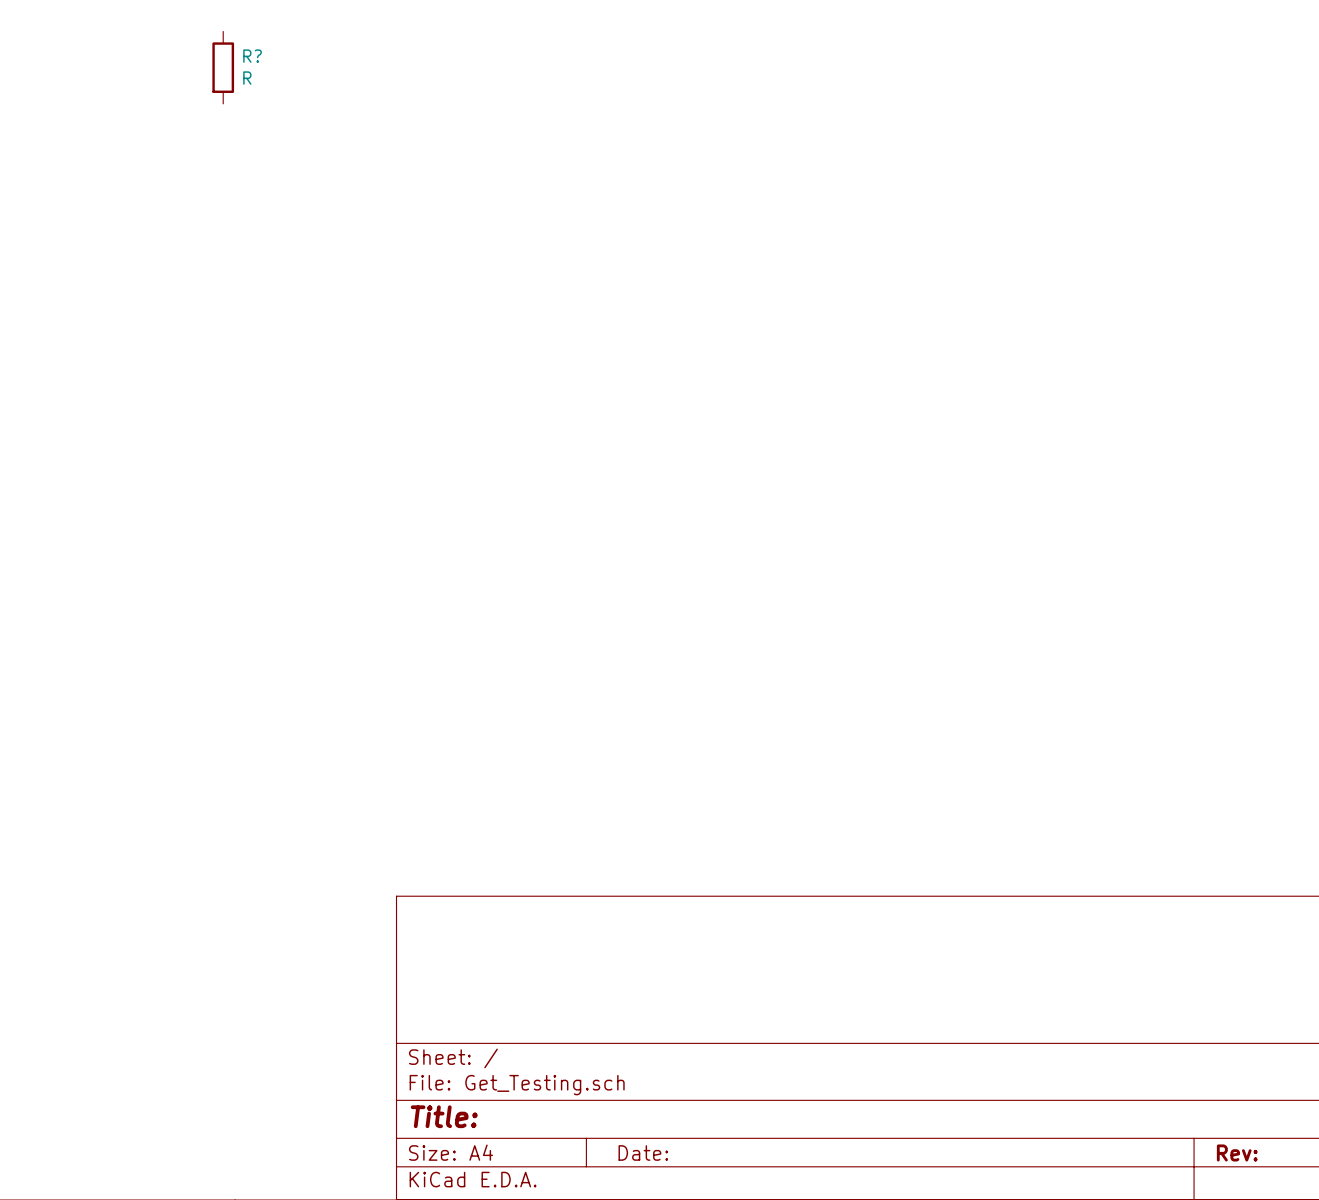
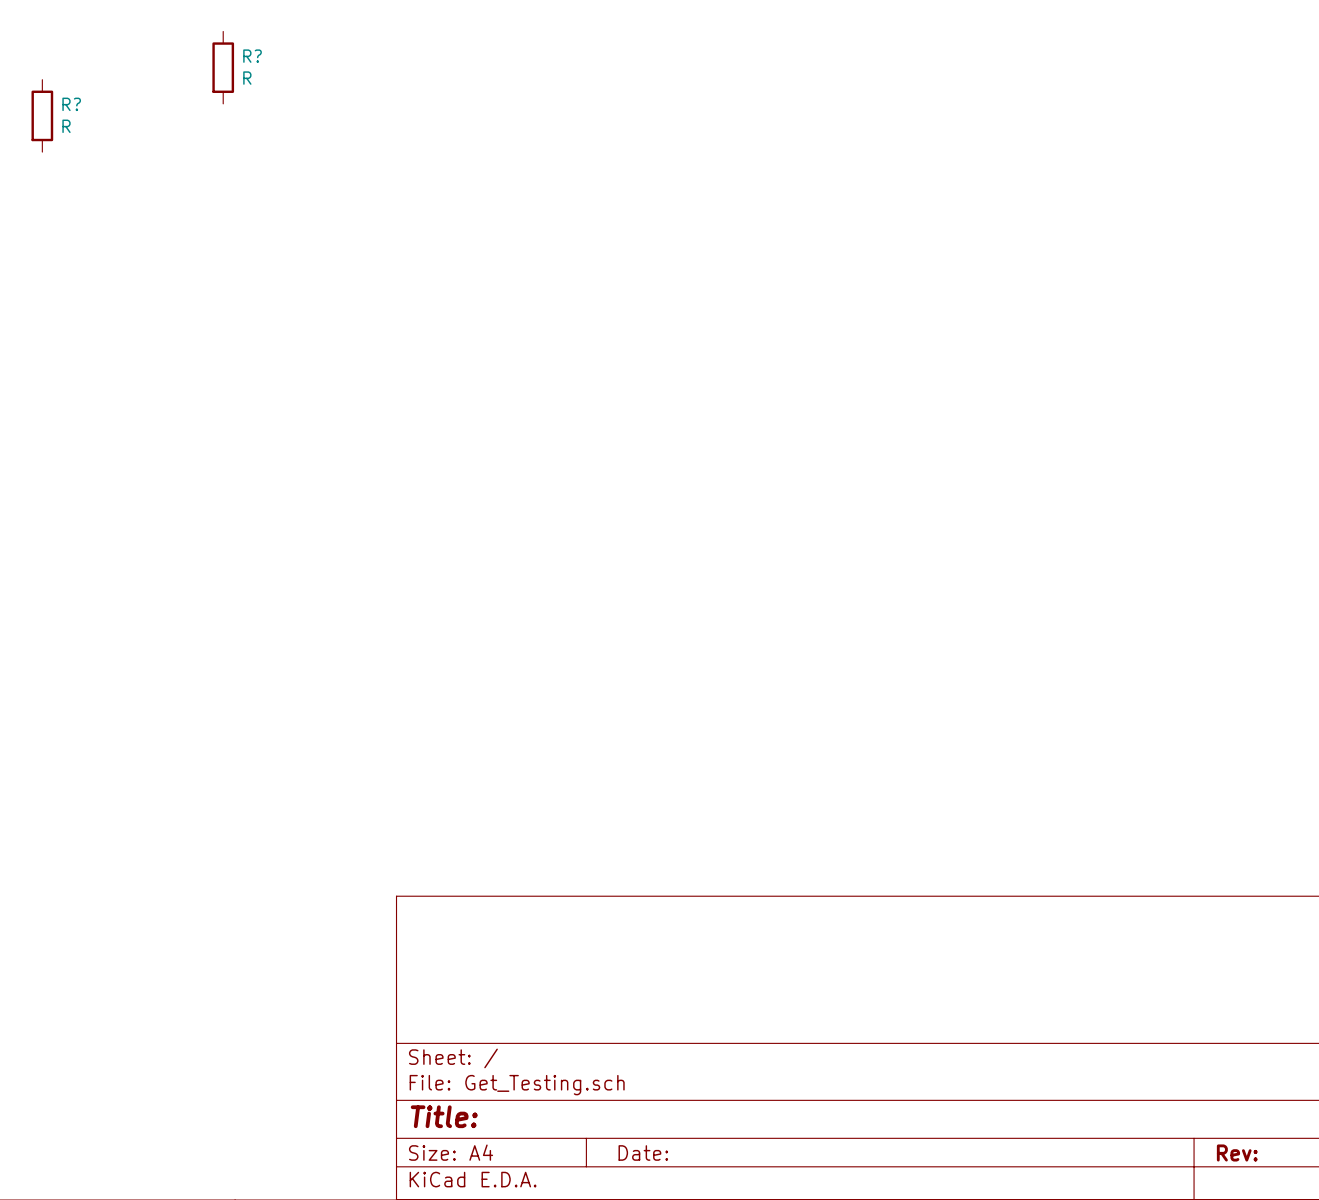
R?: none -> R (42, 115)

